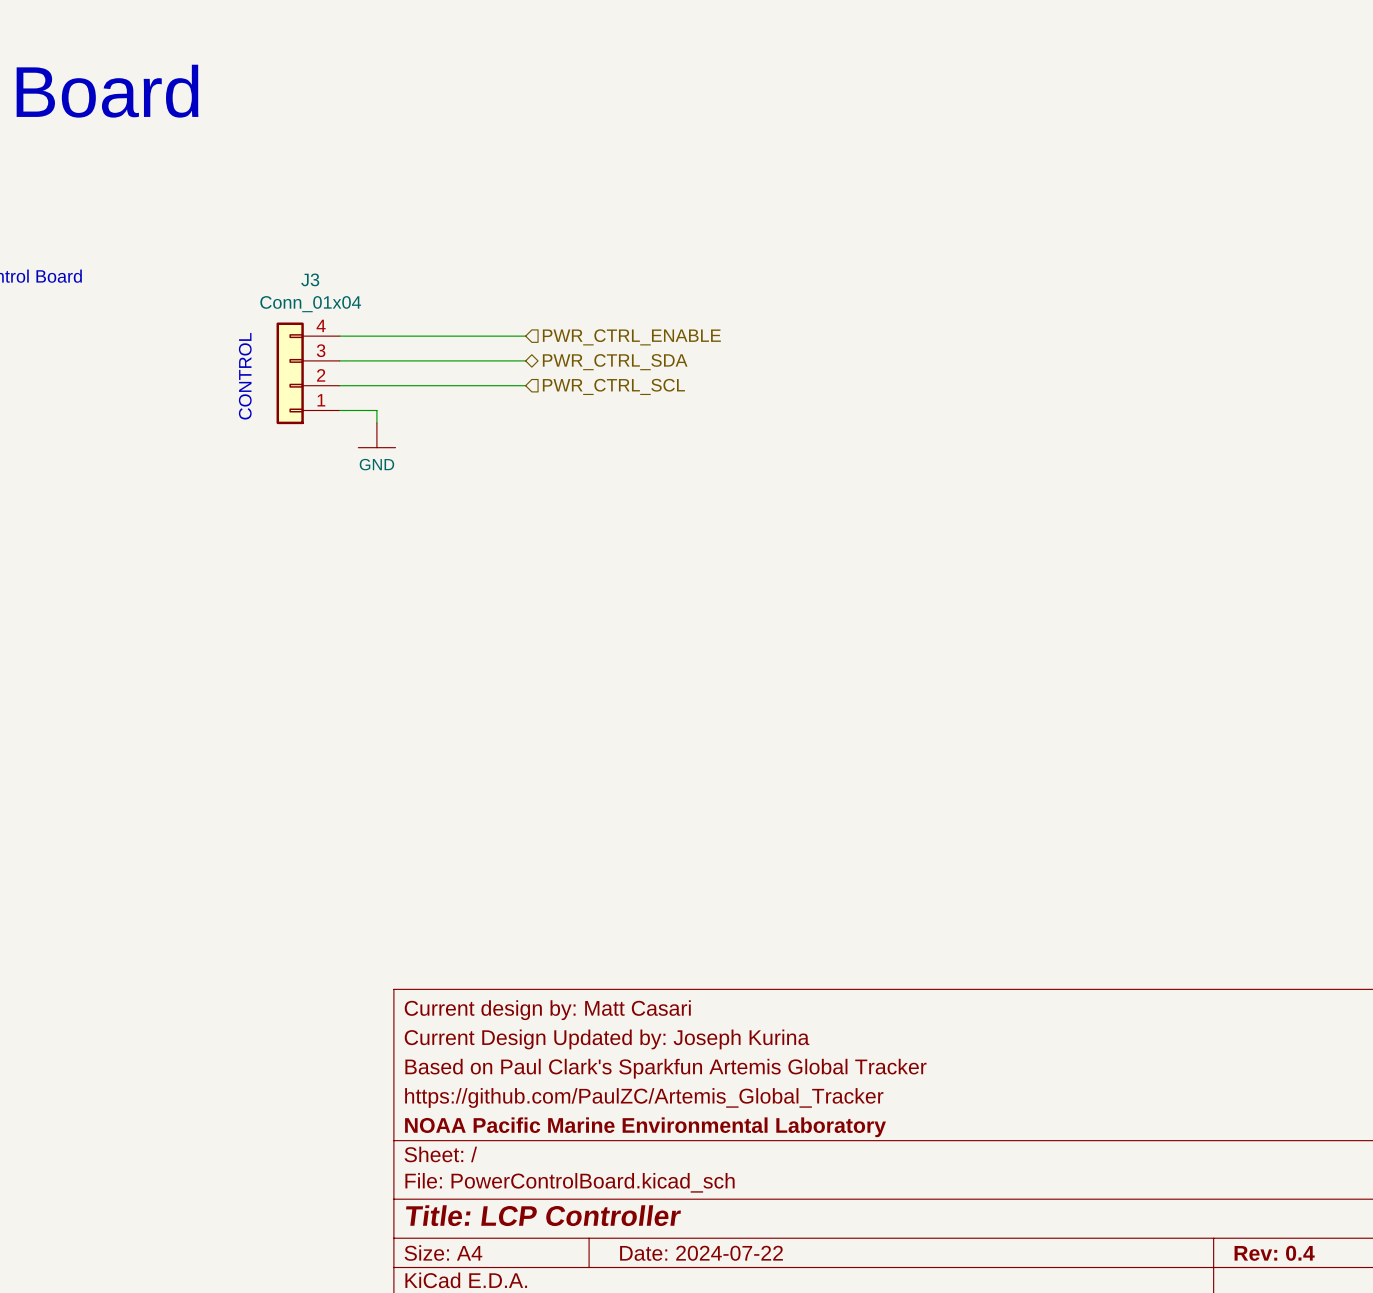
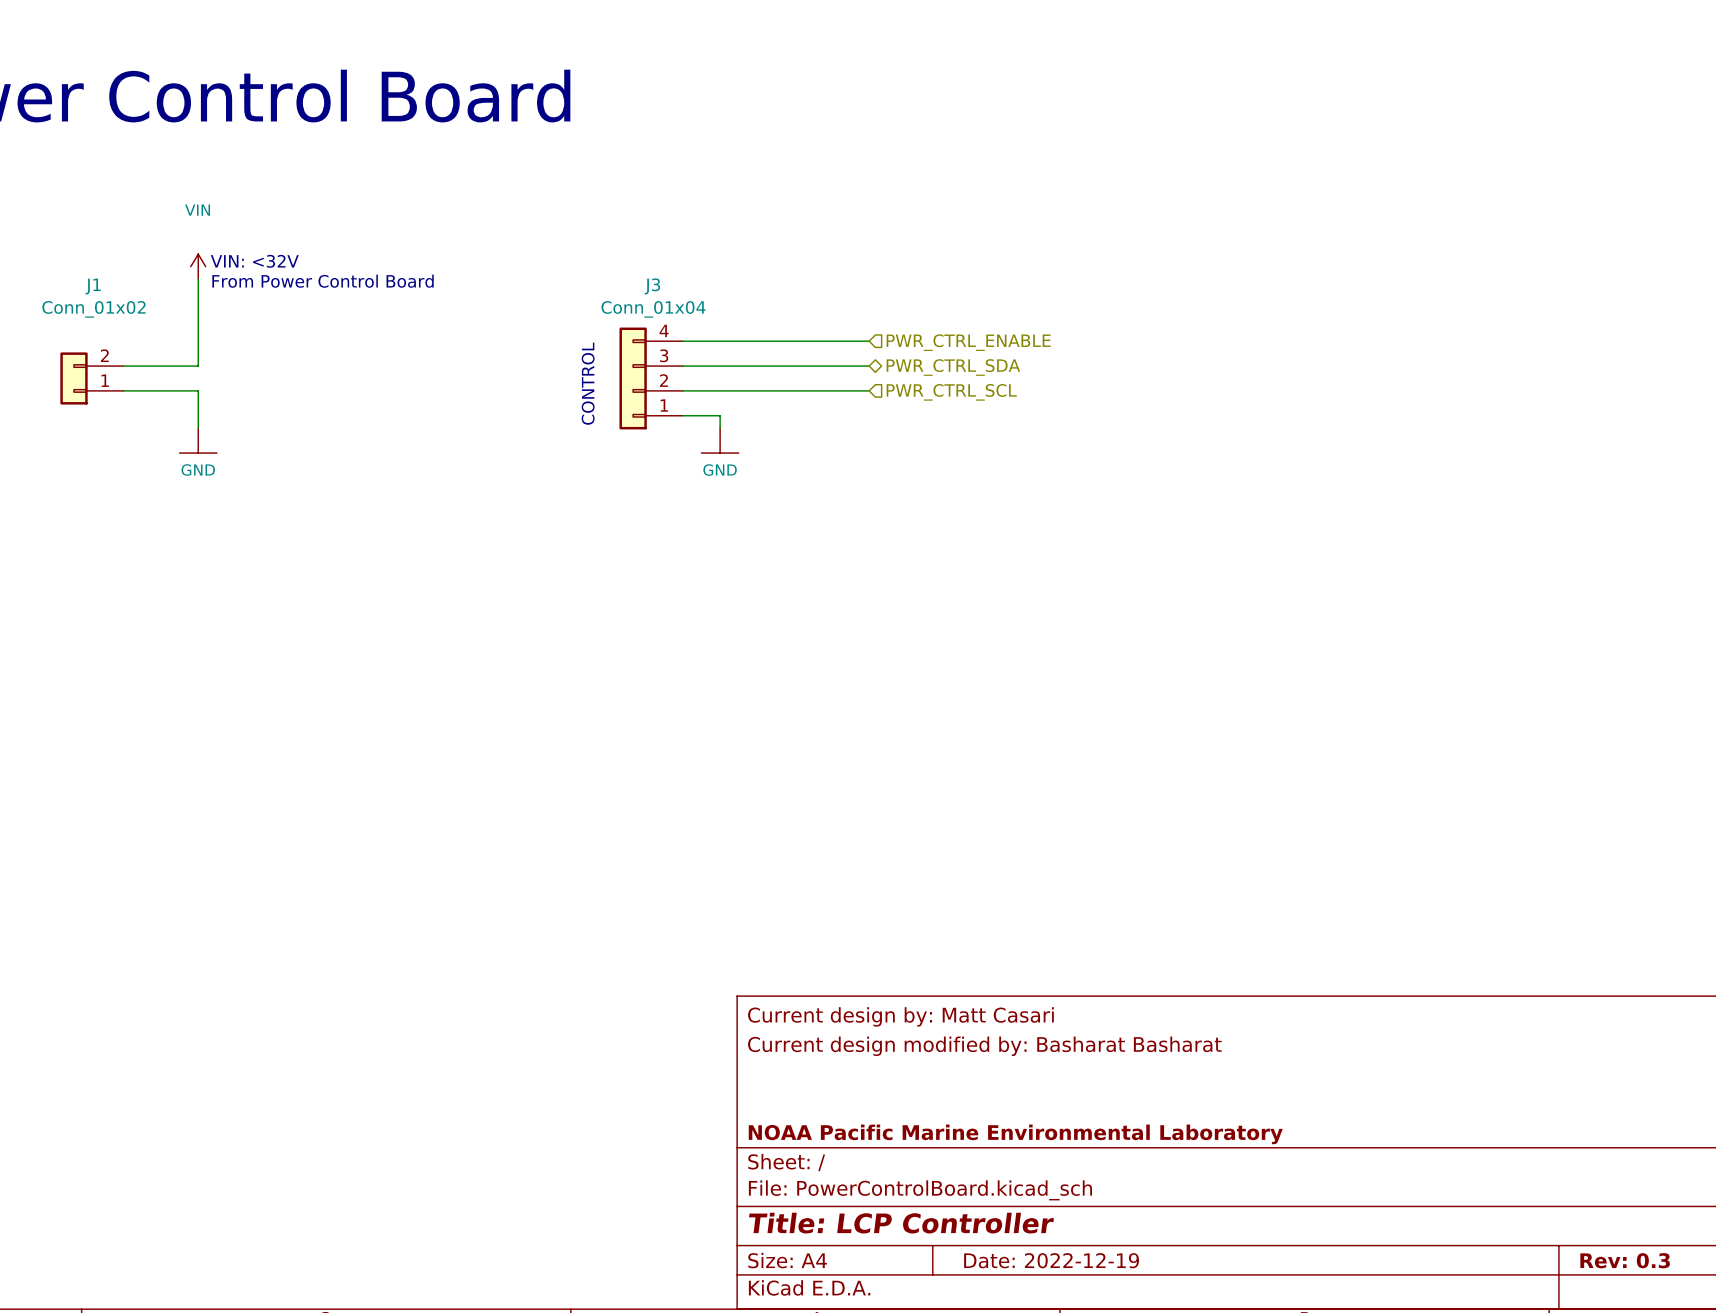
title block: Current Design Updated by: Joseph Kurina (607, 1039) -> Current design modified by: Basharat Basharat (984, 1046)
title block: Based on Paul Clark's Sparkfun Artemis Global Tracker (665, 1068) -> none
title block: https://github.com/PaulZC/Artemis_Global_Tracker (644, 1097) -> none
title block: Date: 2024-07-22 (701, 1253) -> Date: 2022-12-19 (1051, 1260)
title block: Rev: 0.4 (1274, 1253) -> Rev: 0.3 (1625, 1260)

